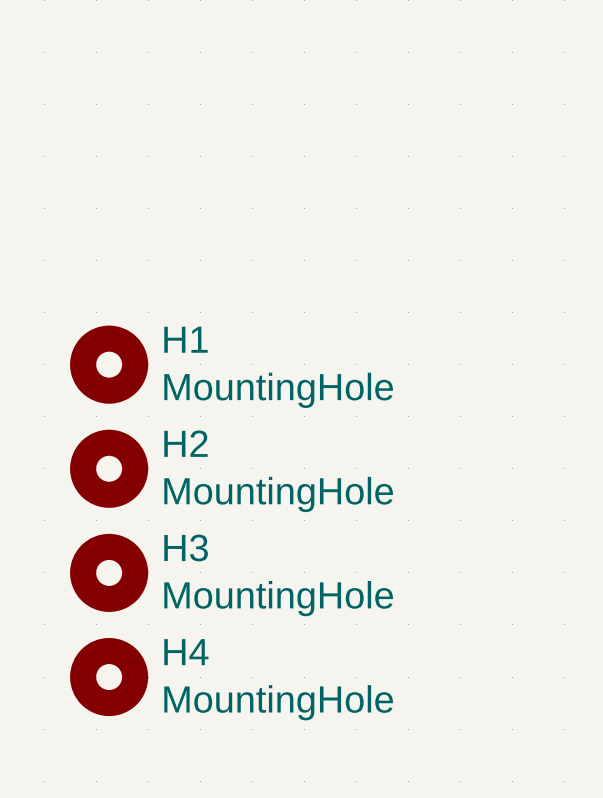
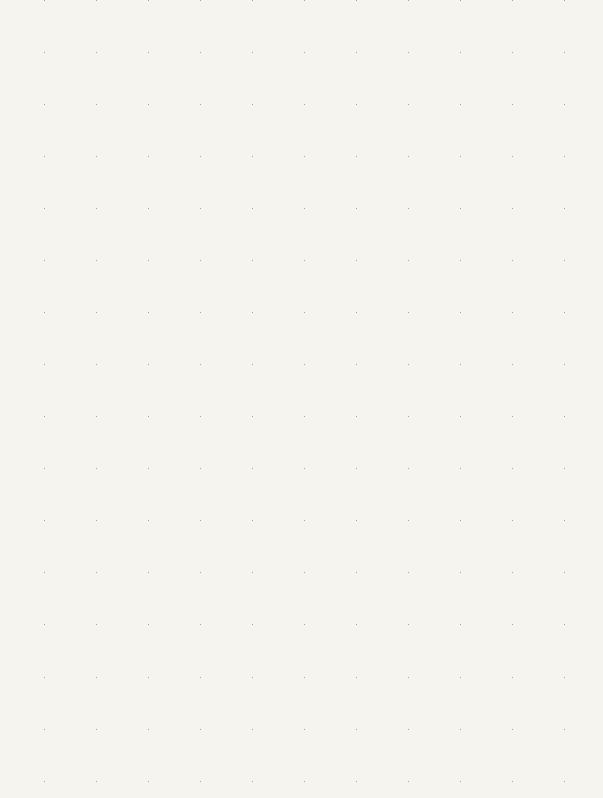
H1: MountingHole (109, 364) -> none
H2: MountingHole (109, 468) -> none
H3: MountingHole (109, 572) -> none
H4: MountingHole (109, 677) -> none

